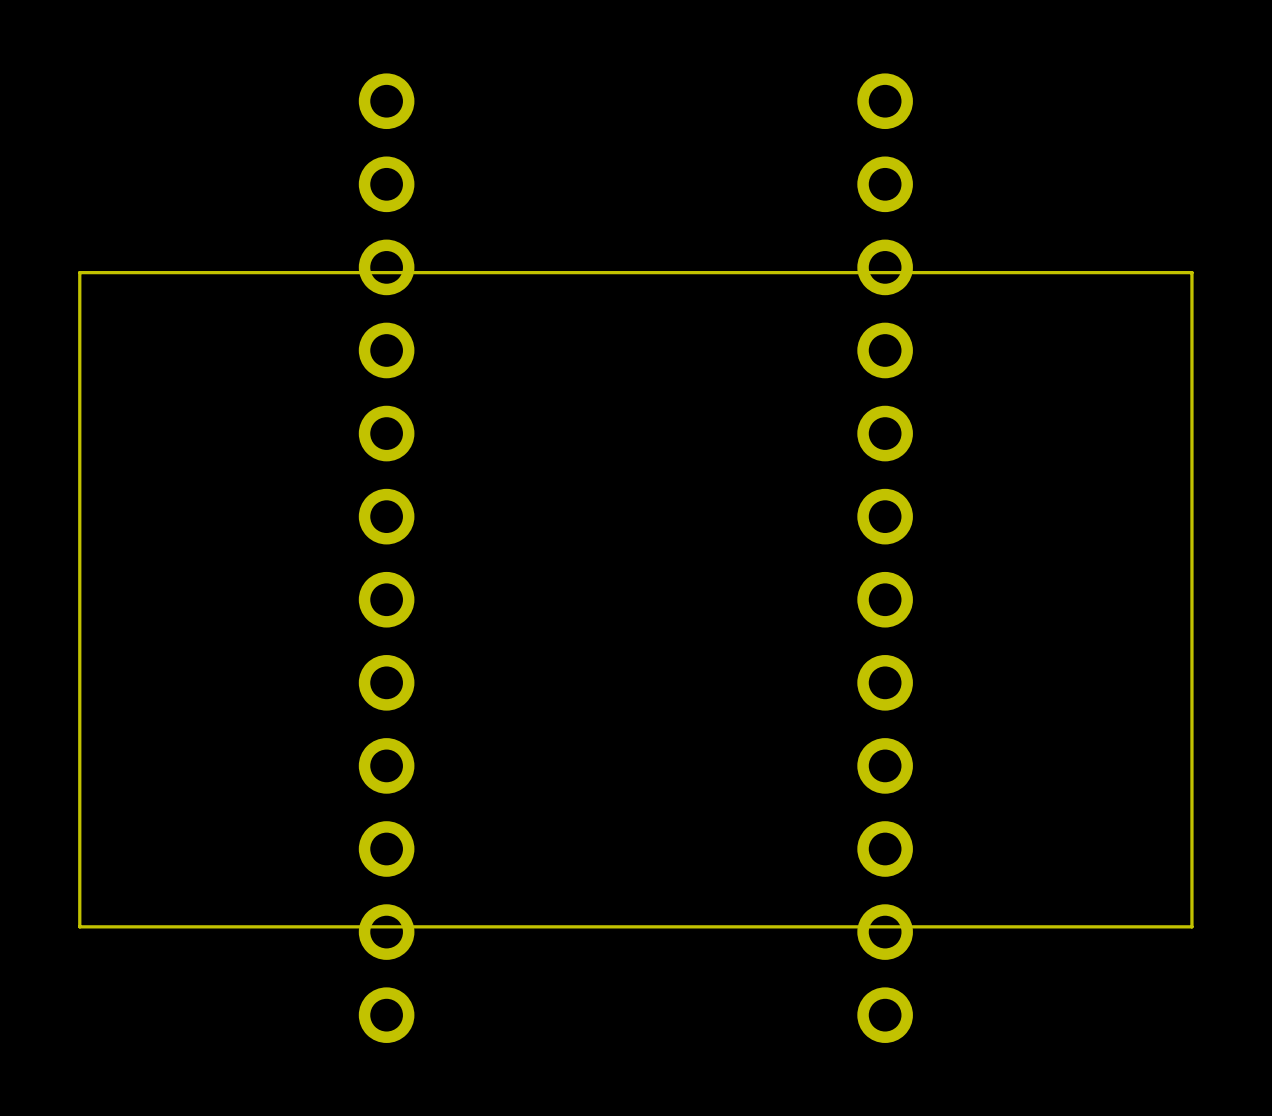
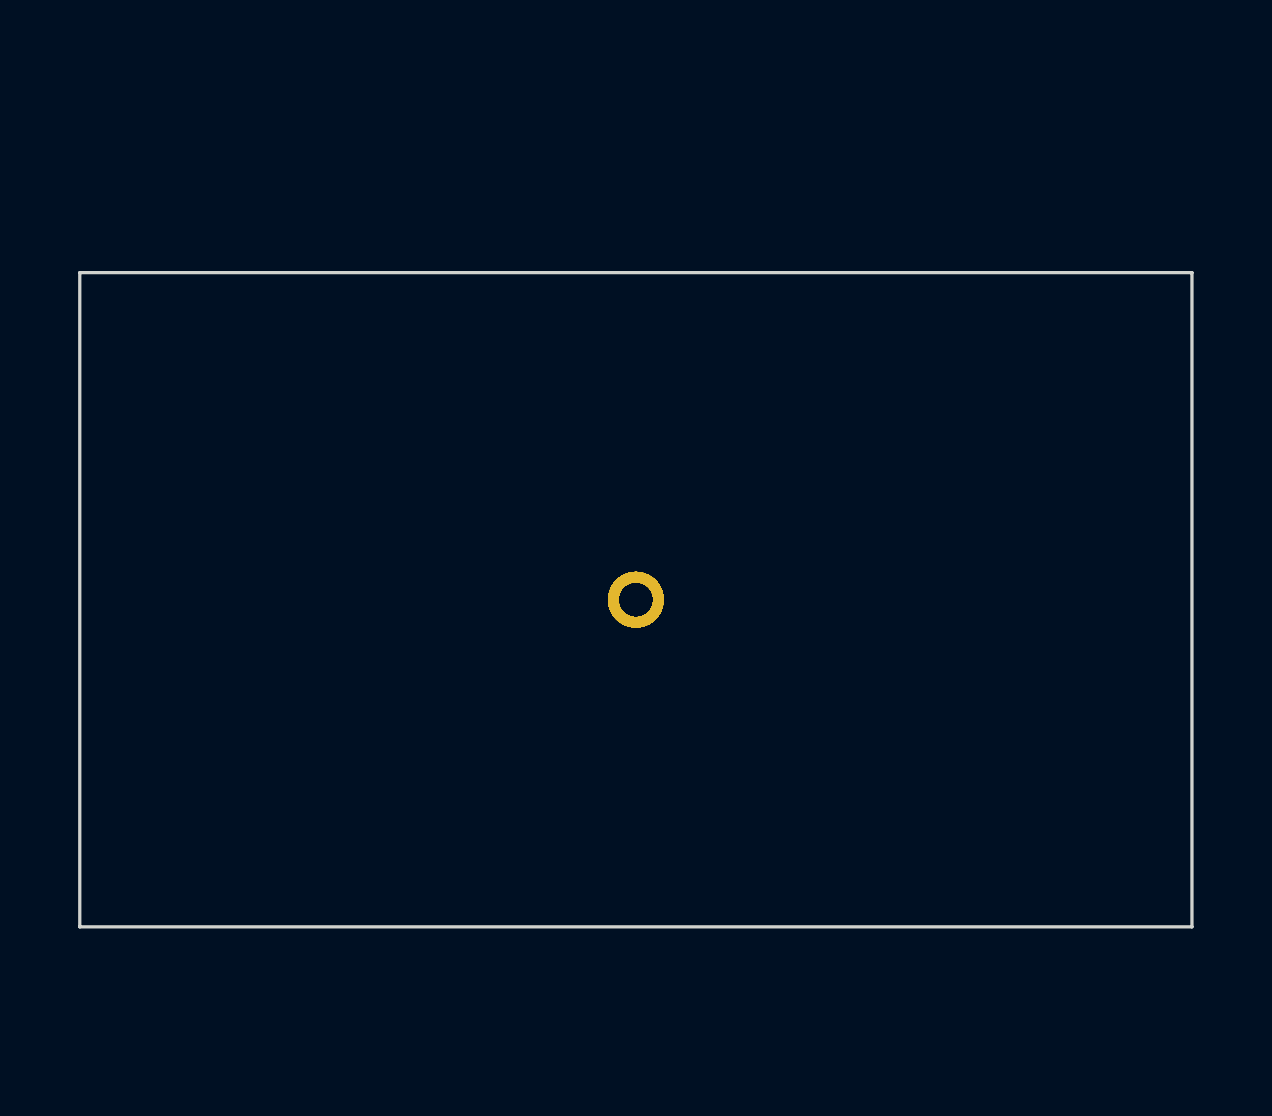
part: (386, 101) -> none
part: (885, 101) -> none
part: (386, 184) -> none
part: (885, 184) -> none
part: (386, 267) -> none
part: (885, 267) -> none
part: (386, 350) -> none
part: (885, 350) -> none
part: (386, 433) -> none
part: (885, 433) -> none
part: (386, 516) -> none
part: (885, 516) -> none
part: (386, 599) -> none
part: none -> (635, 599)
part: (885, 599) -> none
part: (386, 682) -> none
part: (885, 682) -> none
part: (386, 765) -> none
part: (885, 765) -> none
part: (386, 848) -> none
part: (885, 848) -> none
part: (386, 932) -> none
part: (885, 932) -> none
part: (386, 1015) -> none
part: (885, 1015) -> none

